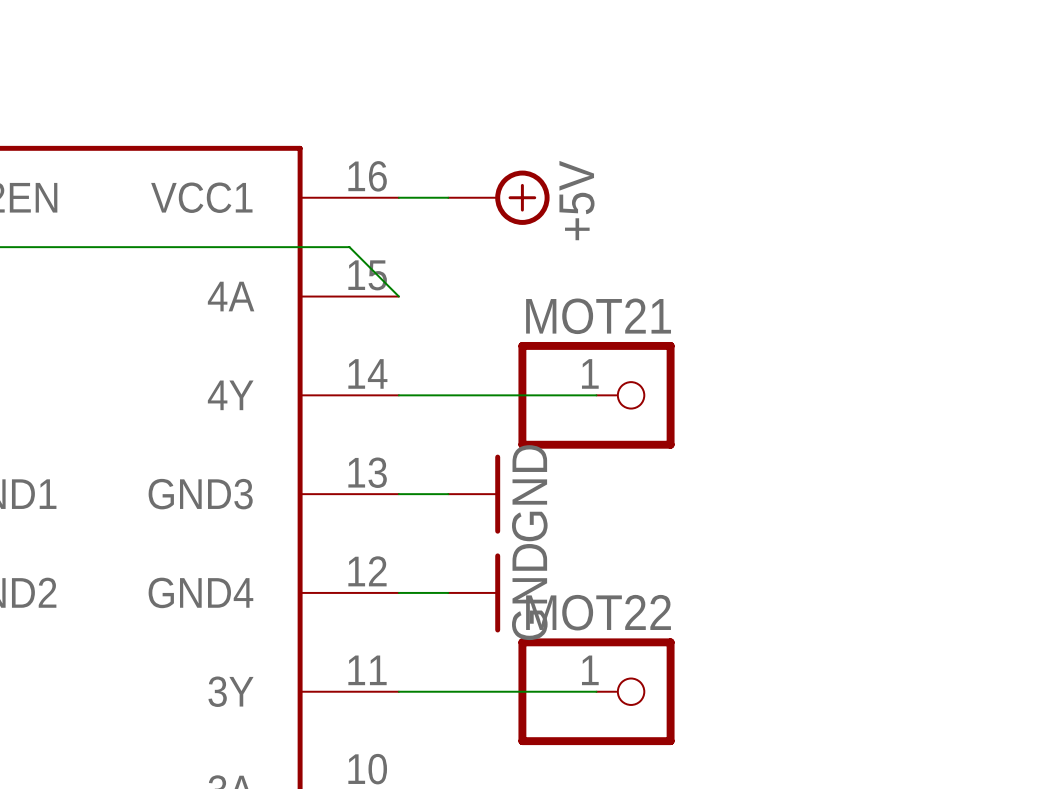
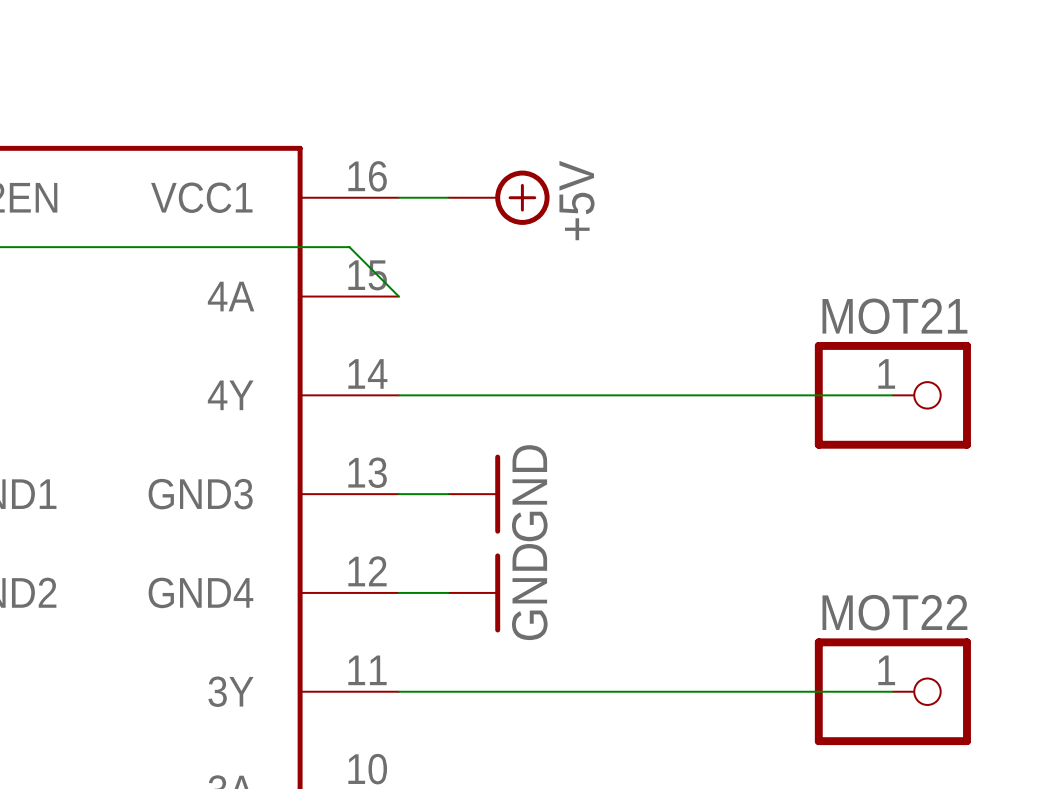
wire: none -> (596, 395) (892, 395)
MOT21 position: (596, 395) -> (892, 395)
wire: none -> (596, 691) (892, 691)
MOT22 position: (596, 691) -> (892, 691)

